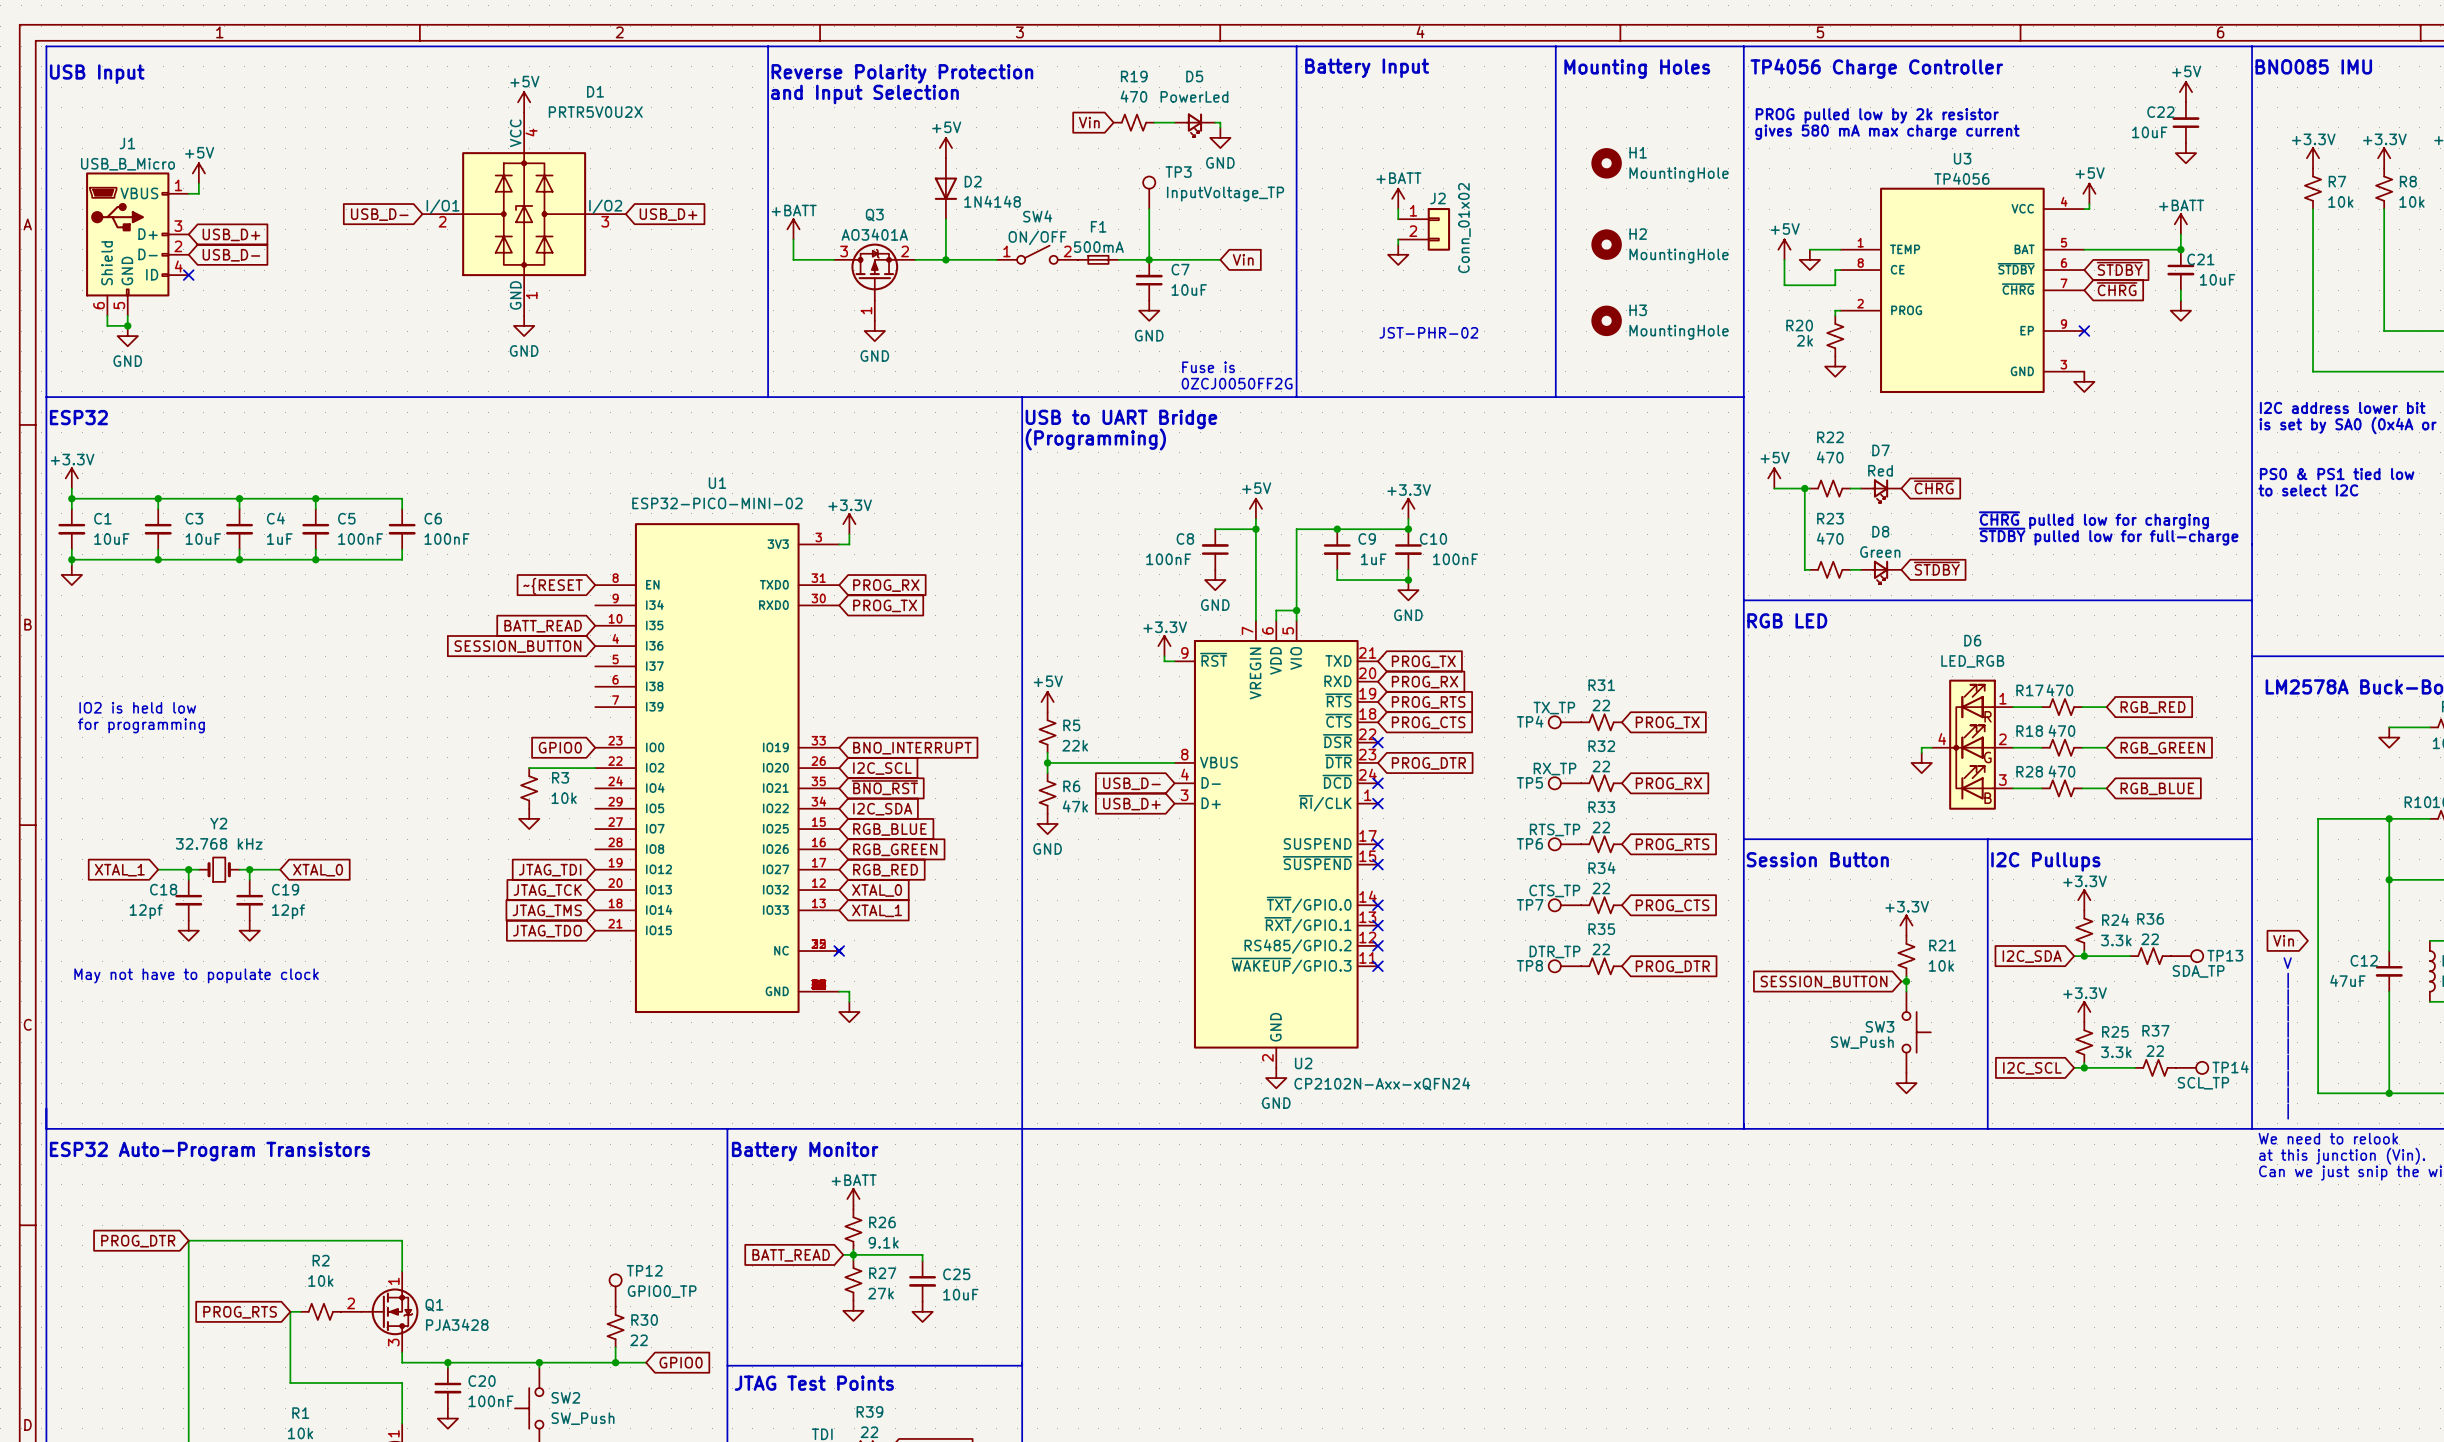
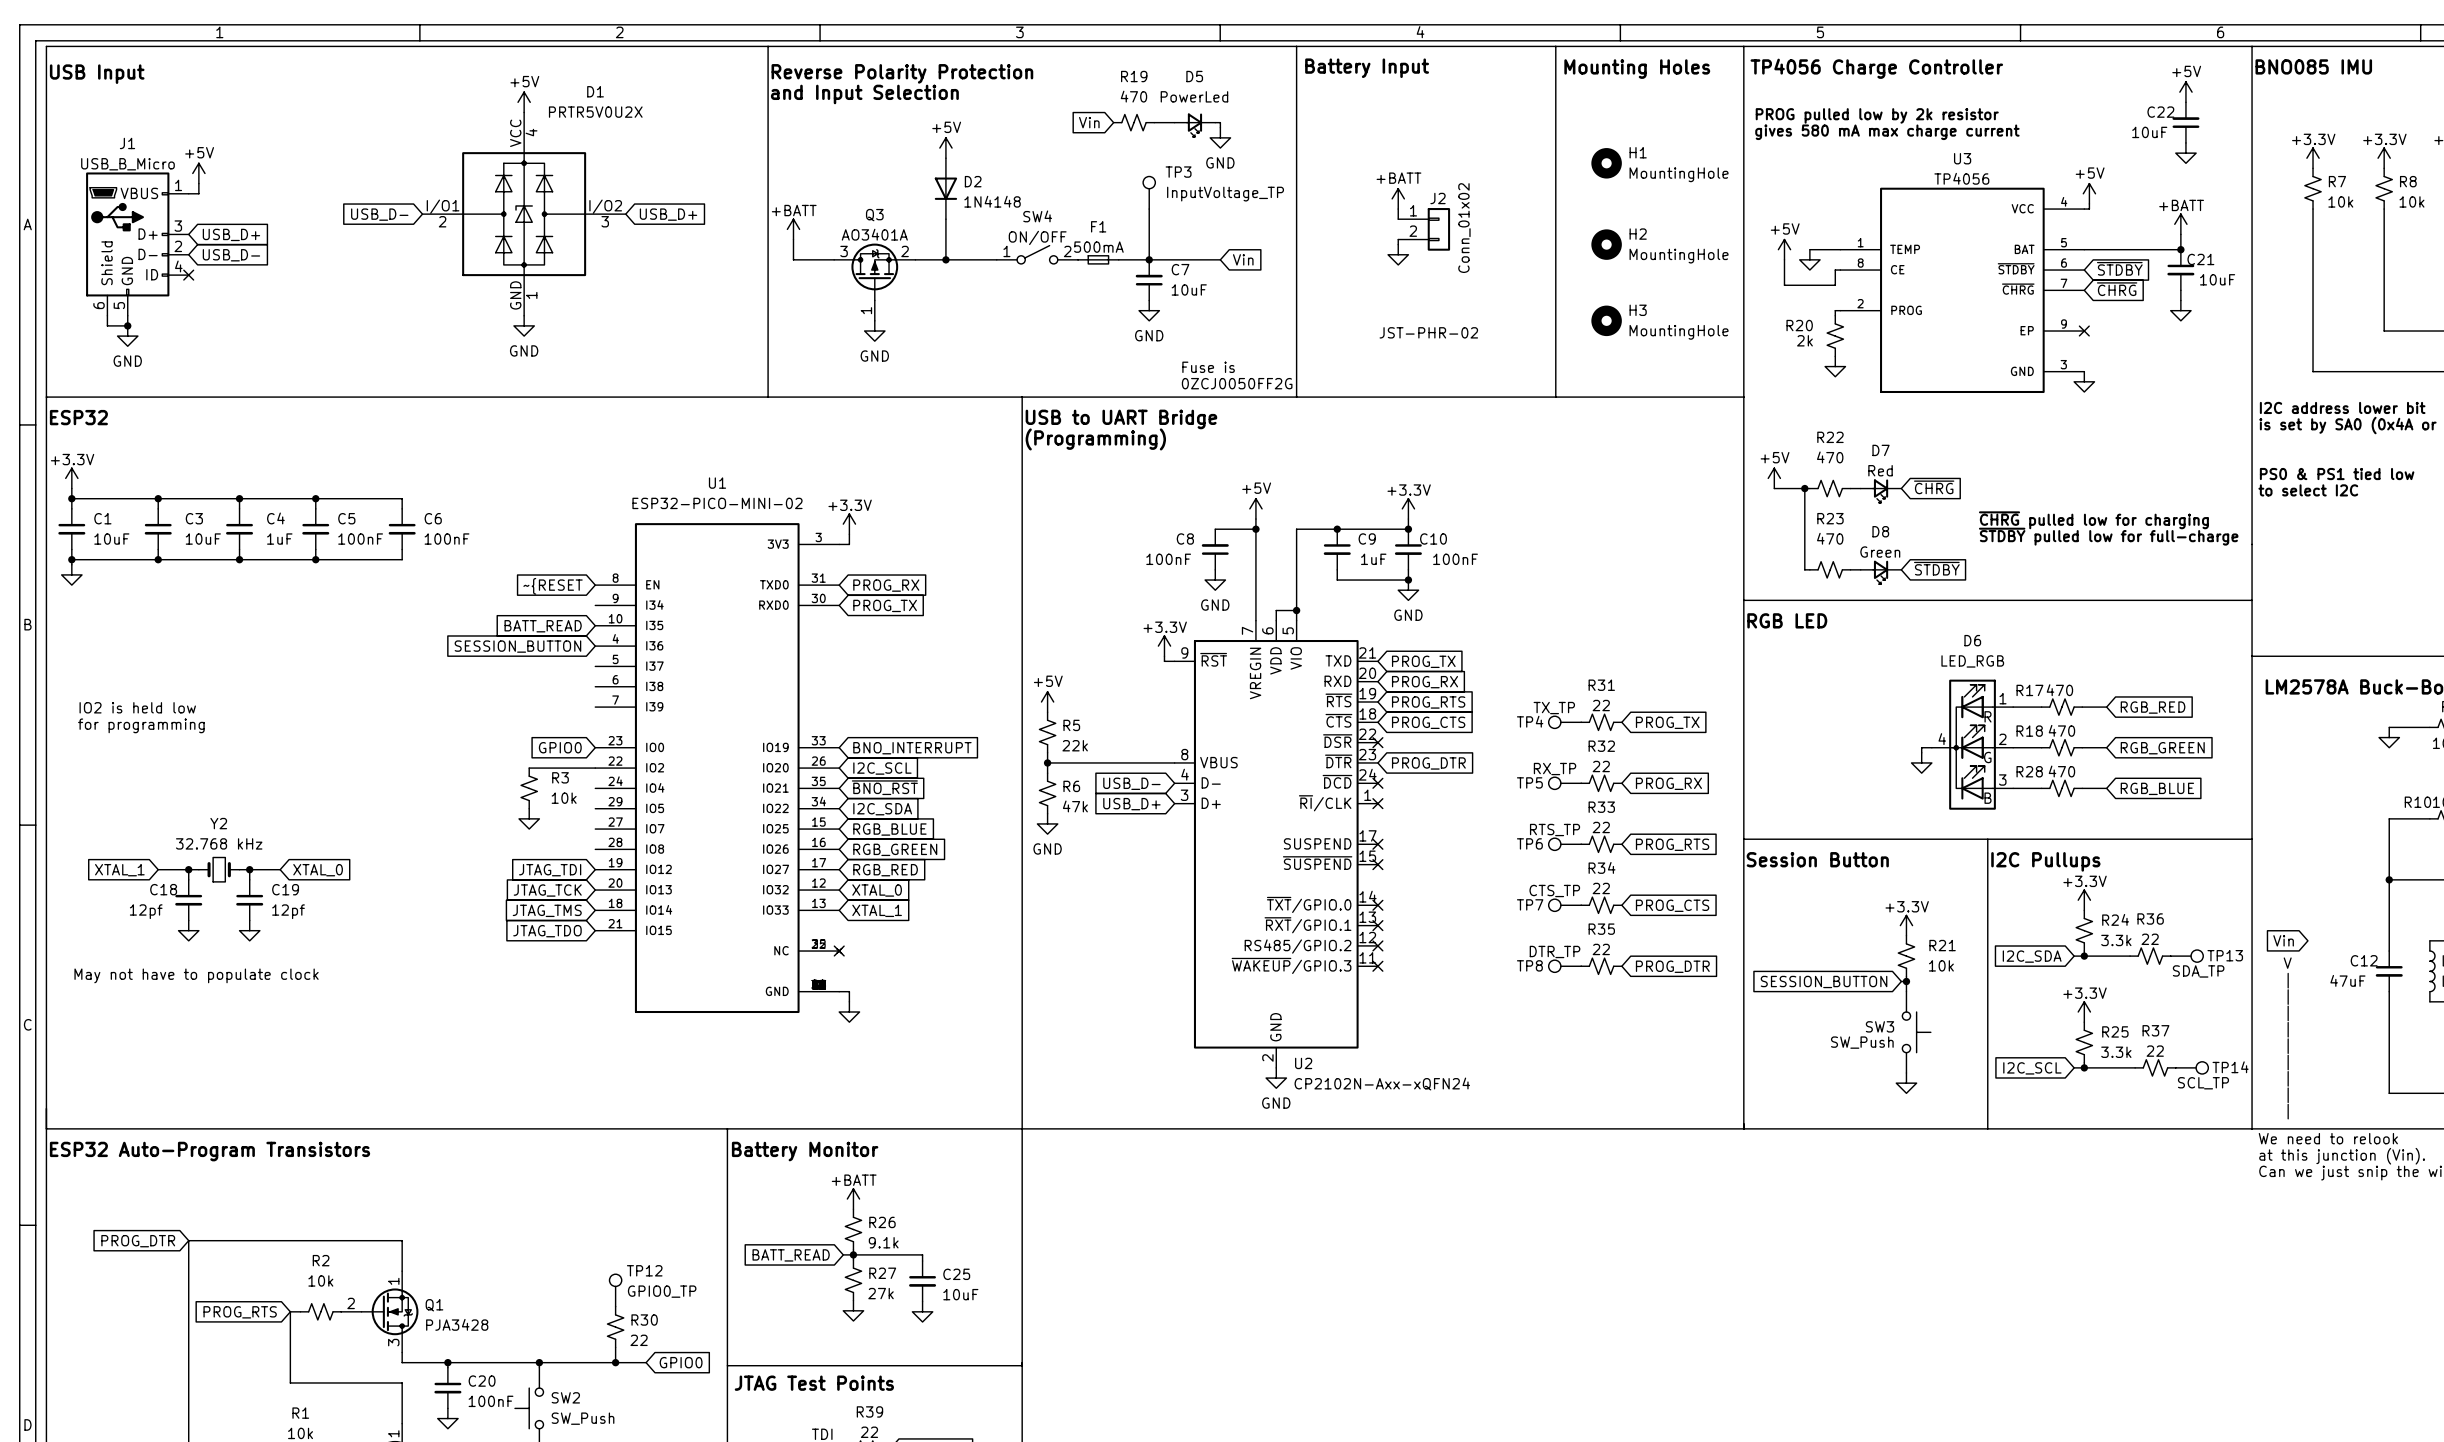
wire: (2389, 818) (2318, 818) (2318, 1093) (2389, 1093) -> none
junction: (2389, 818) -> none
junction: (2389, 1093) -> none

